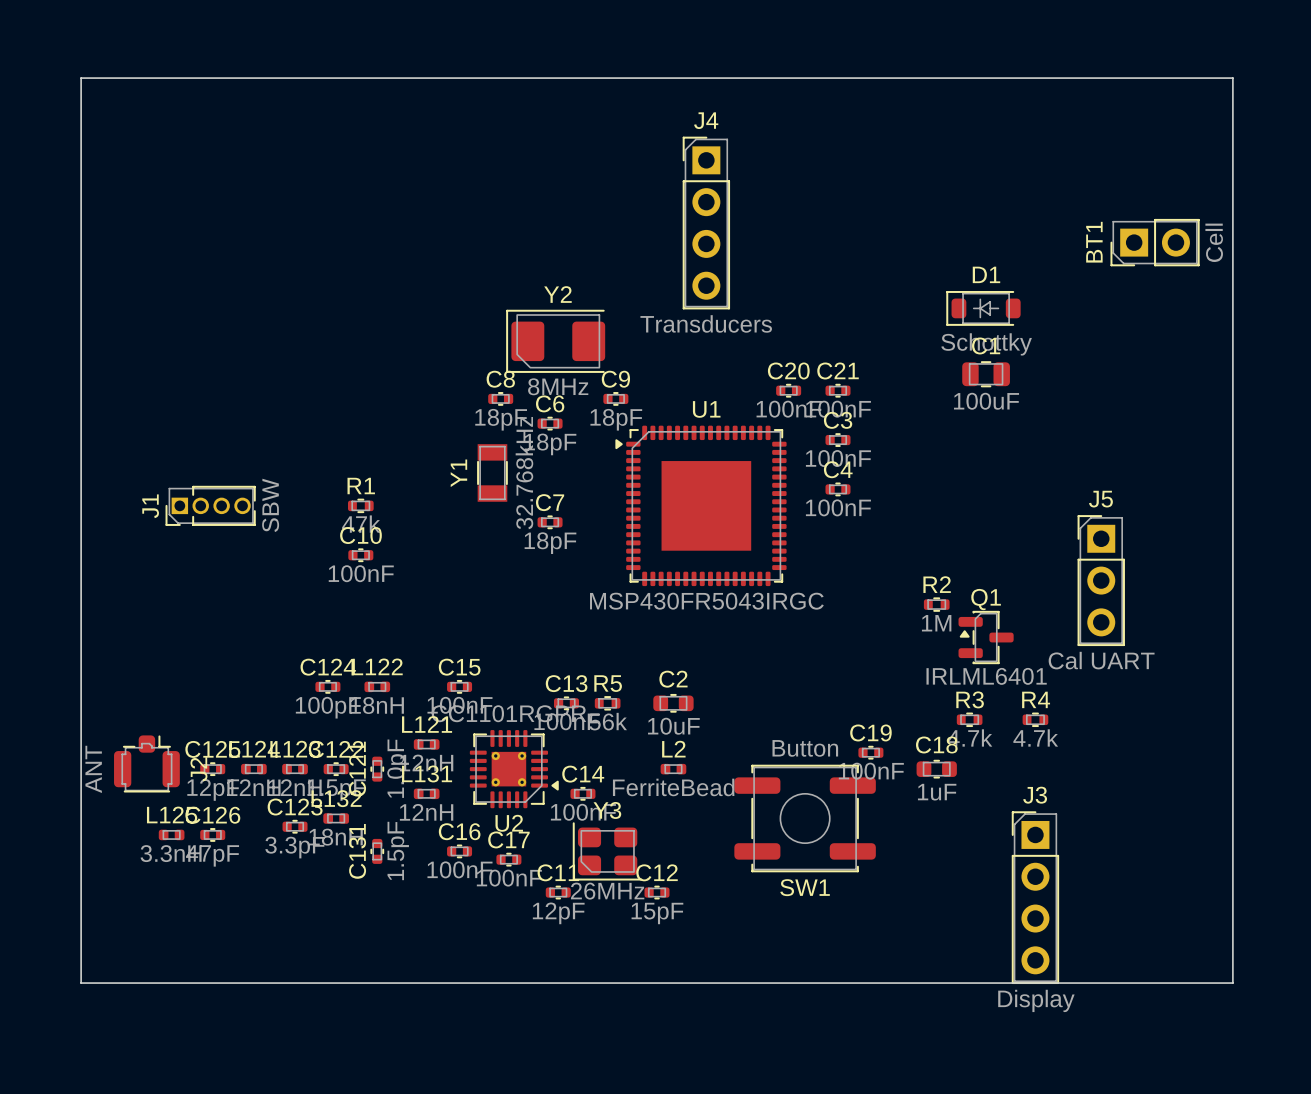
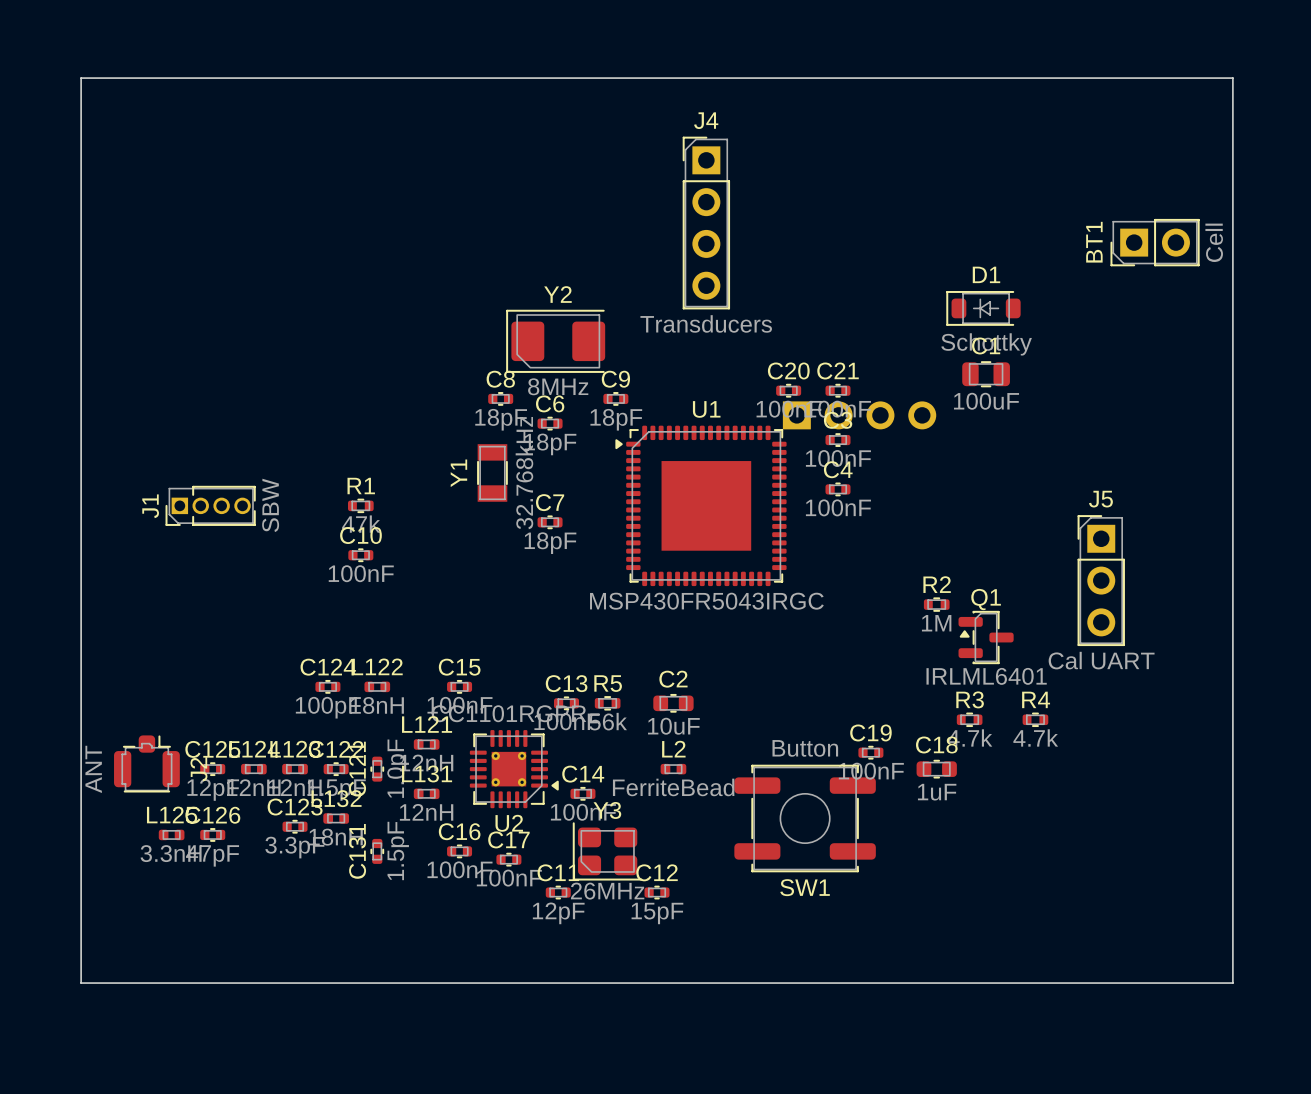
part: none -> (859, 415)
J3: Display (1035, 897) -> none

